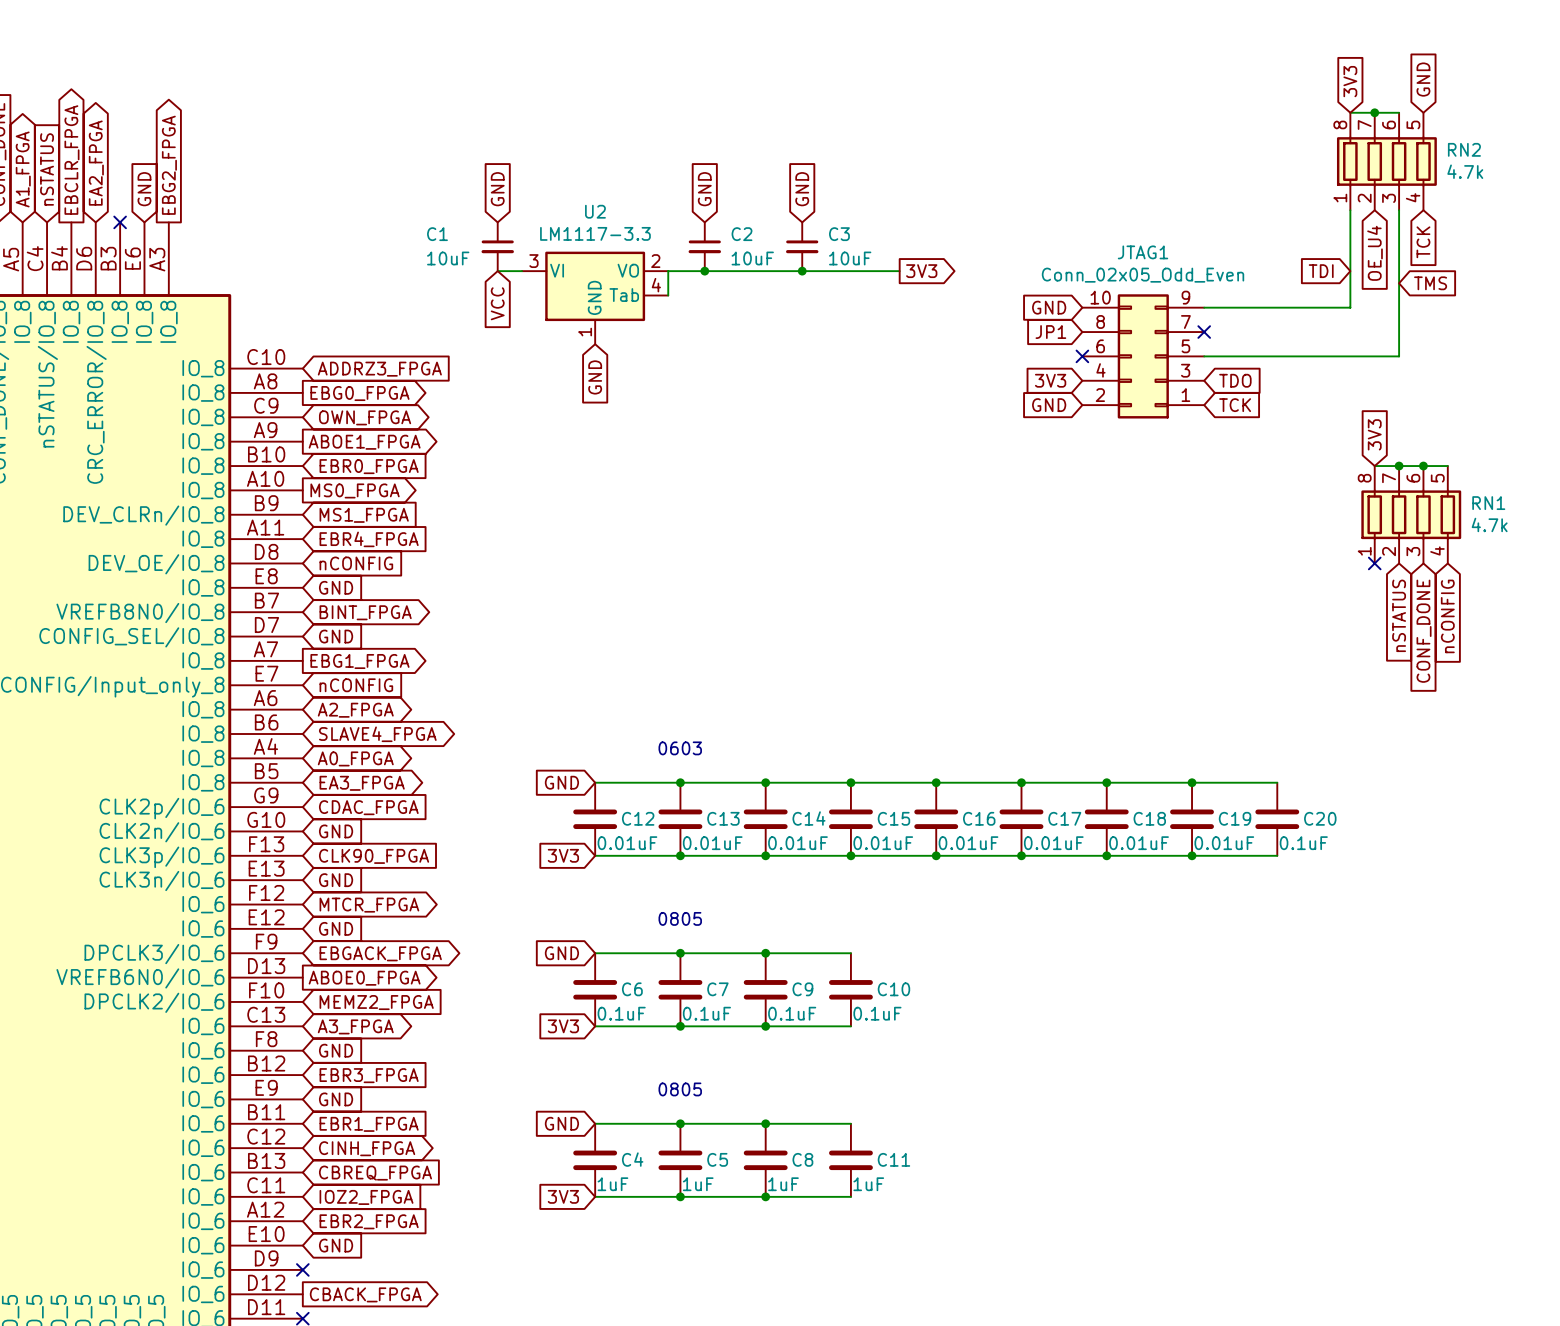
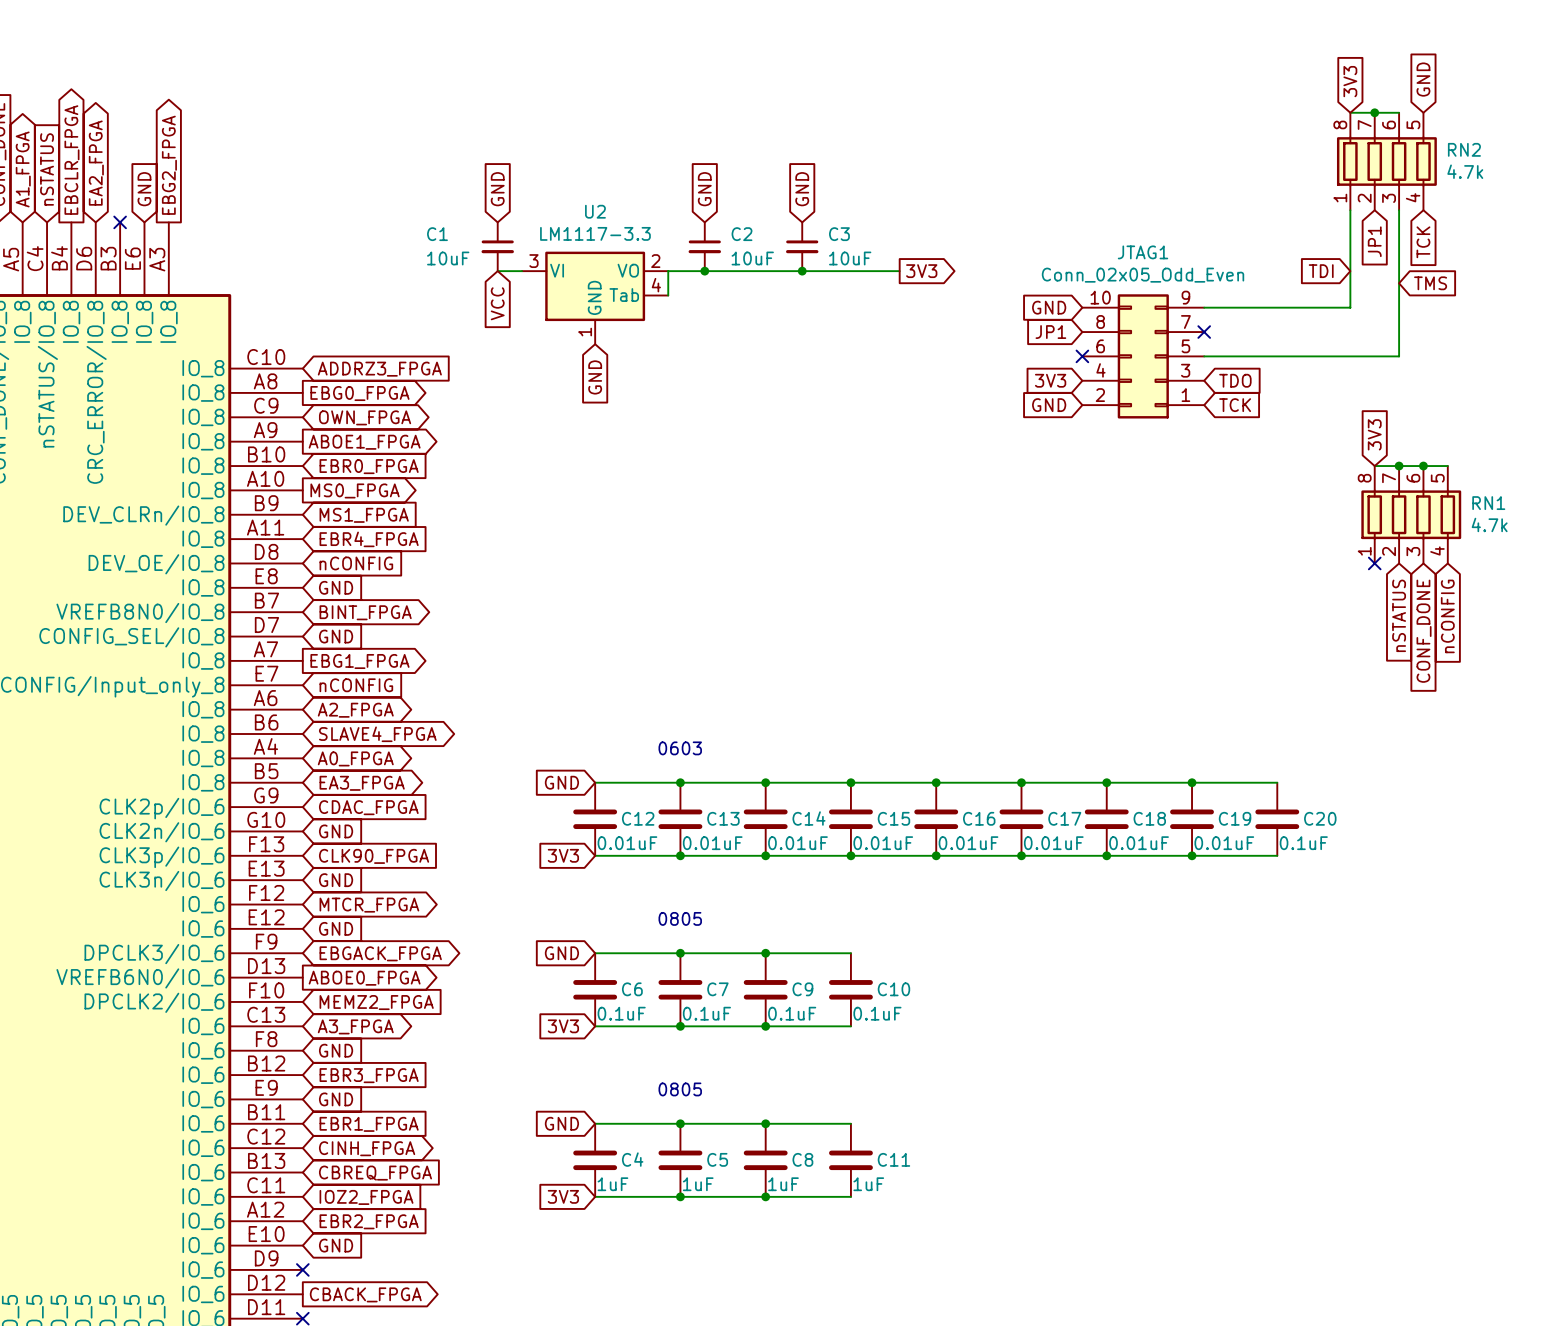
global label: OE_U4 (1375, 253) -> JP1 (1374, 241)

